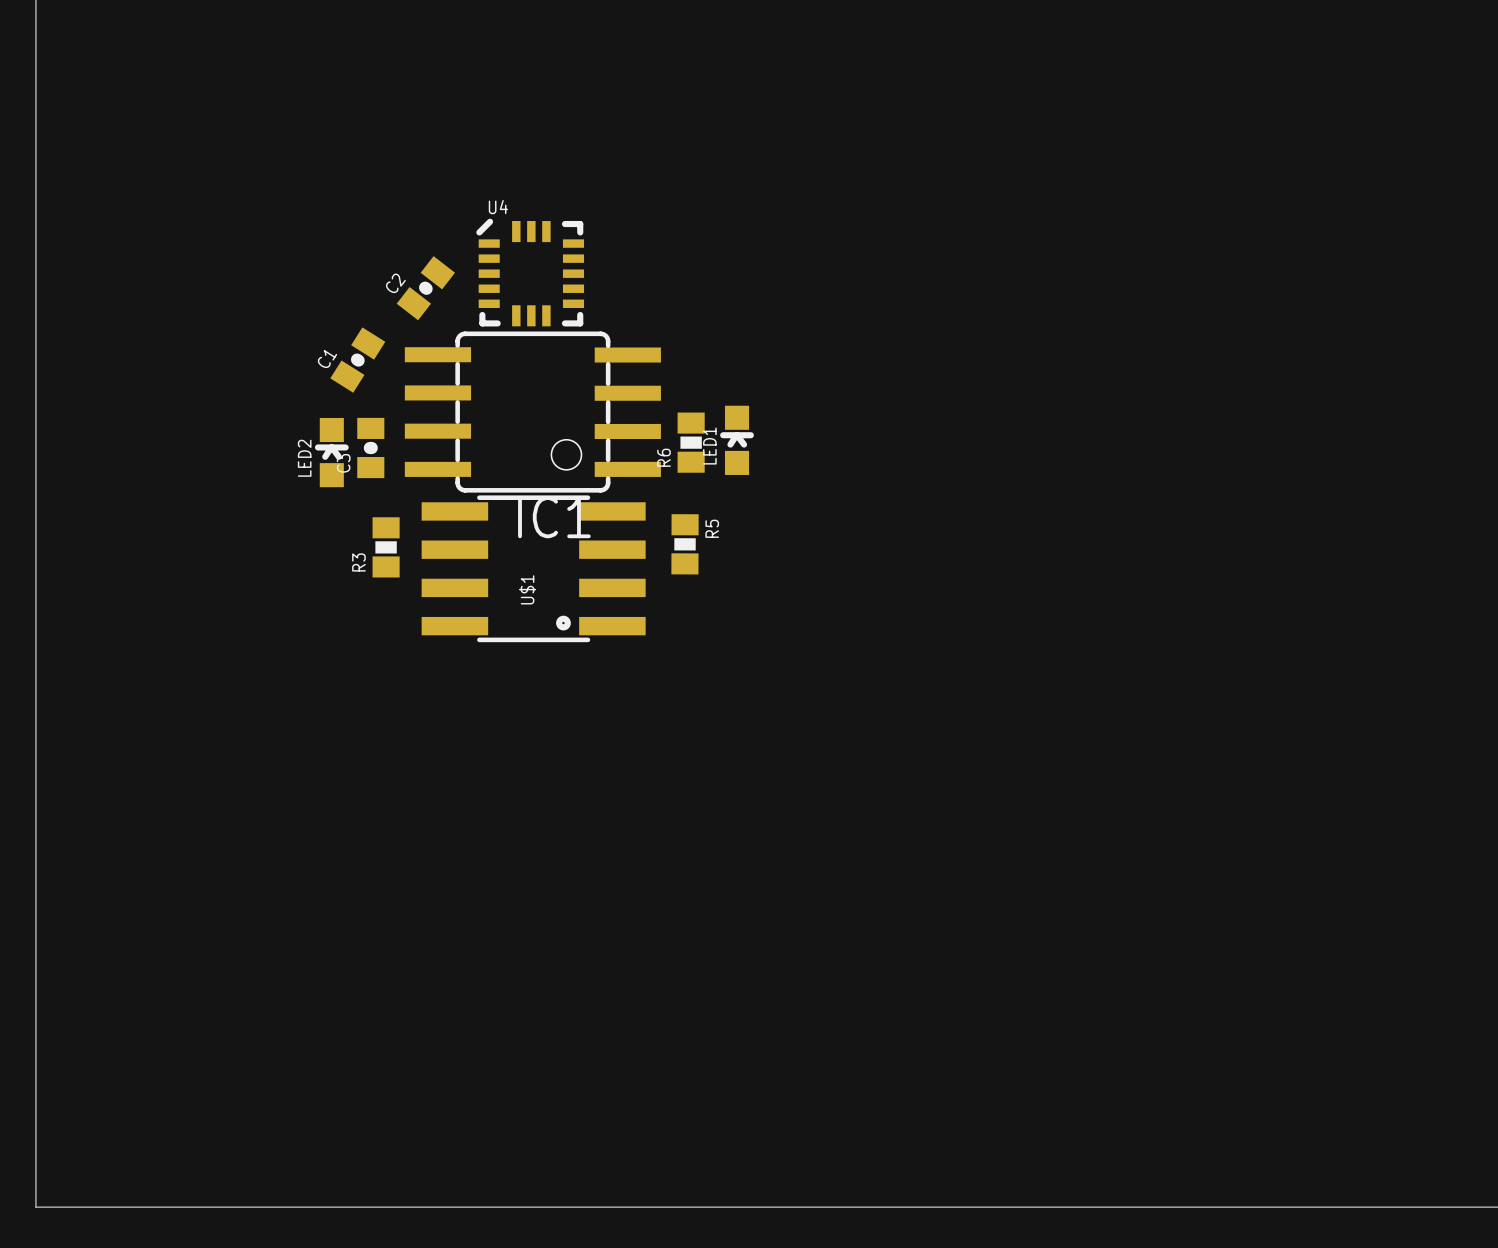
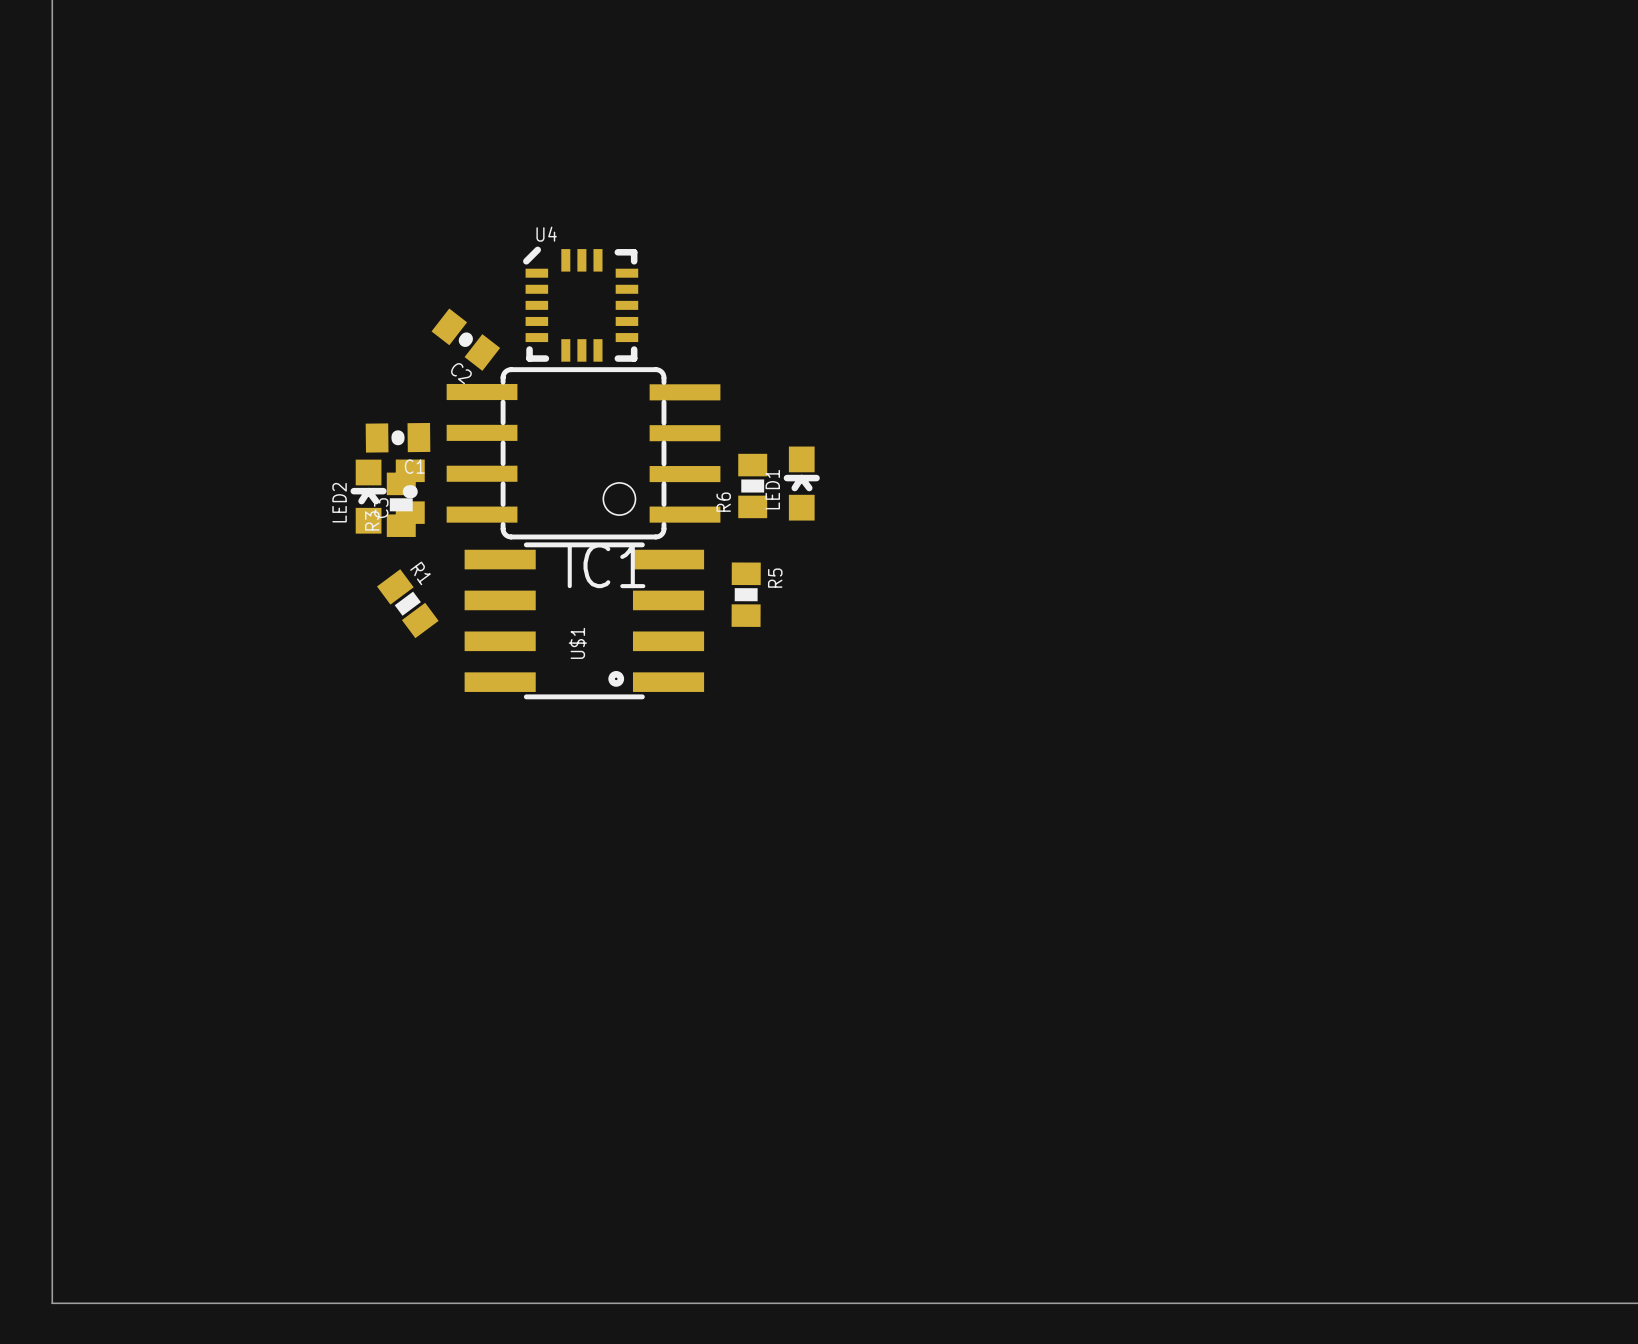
C2 rotation: 0° (425, 288) -> 90° clockwise (465, 339)
C1 rotation: 0° (357, 360) -> 57.2° clockwise (398, 437)
R3 position: (386, 547) -> (401, 504)
R1: none -> (407, 603)

